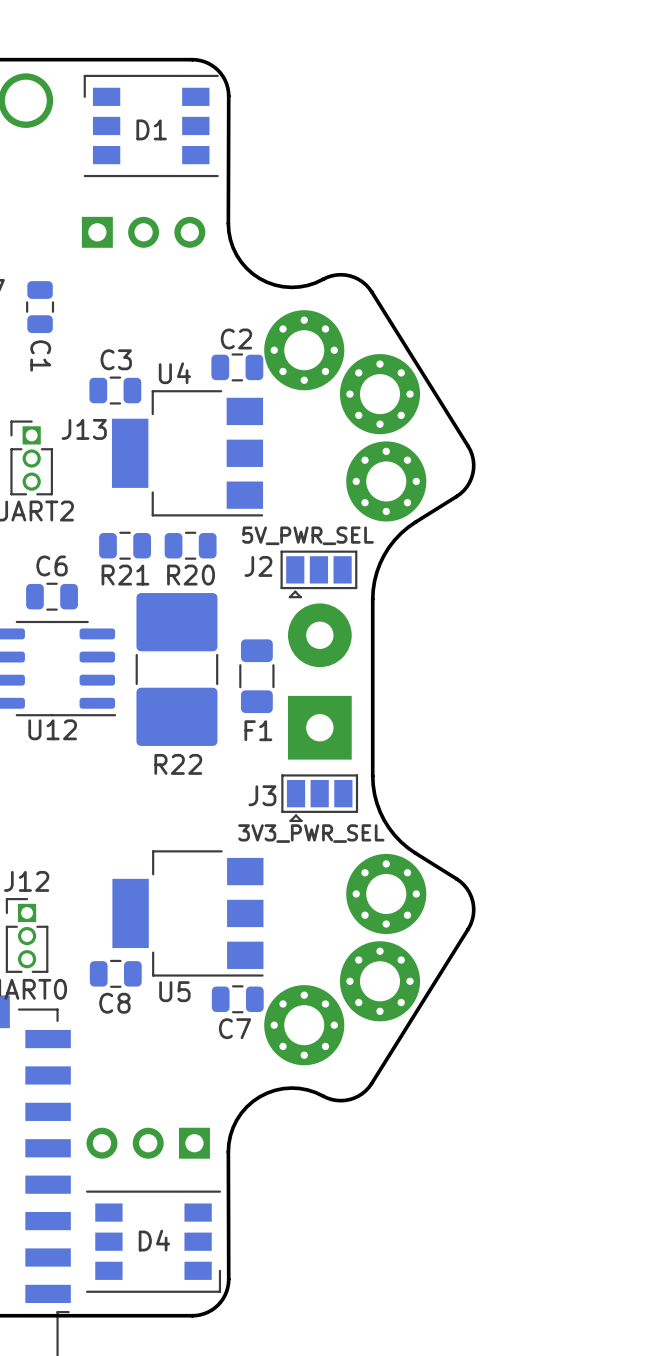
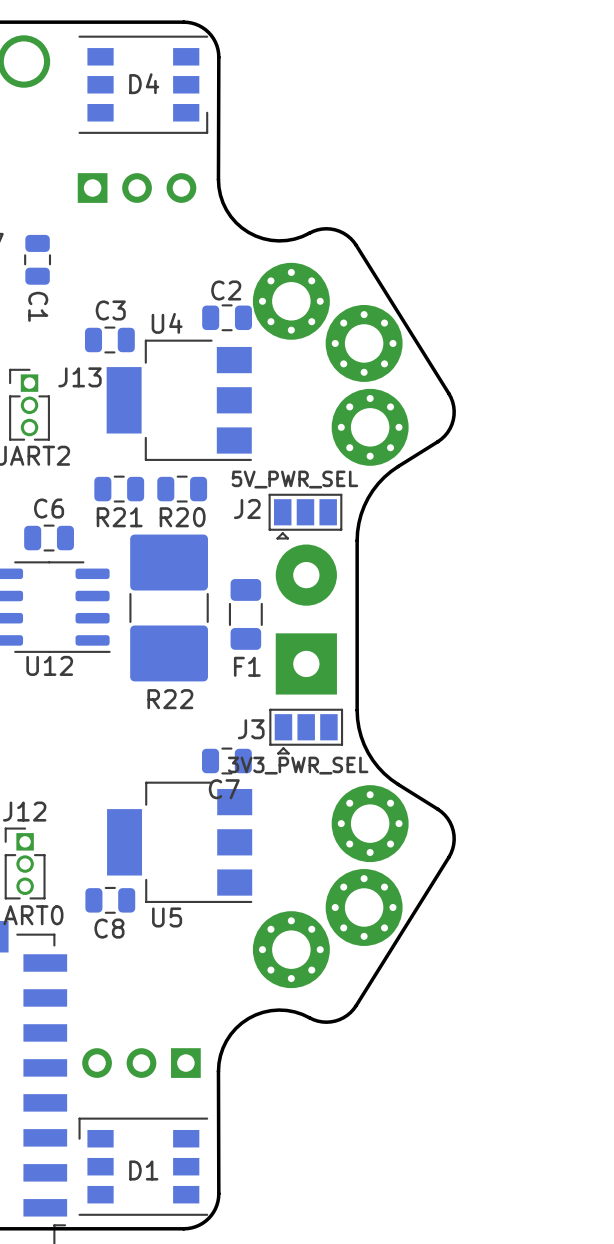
D1 position: (151, 125) -> (143, 1166)
C7 position: (237, 999) -> (226, 761)
D4 position: (153, 1241) -> (143, 84)

